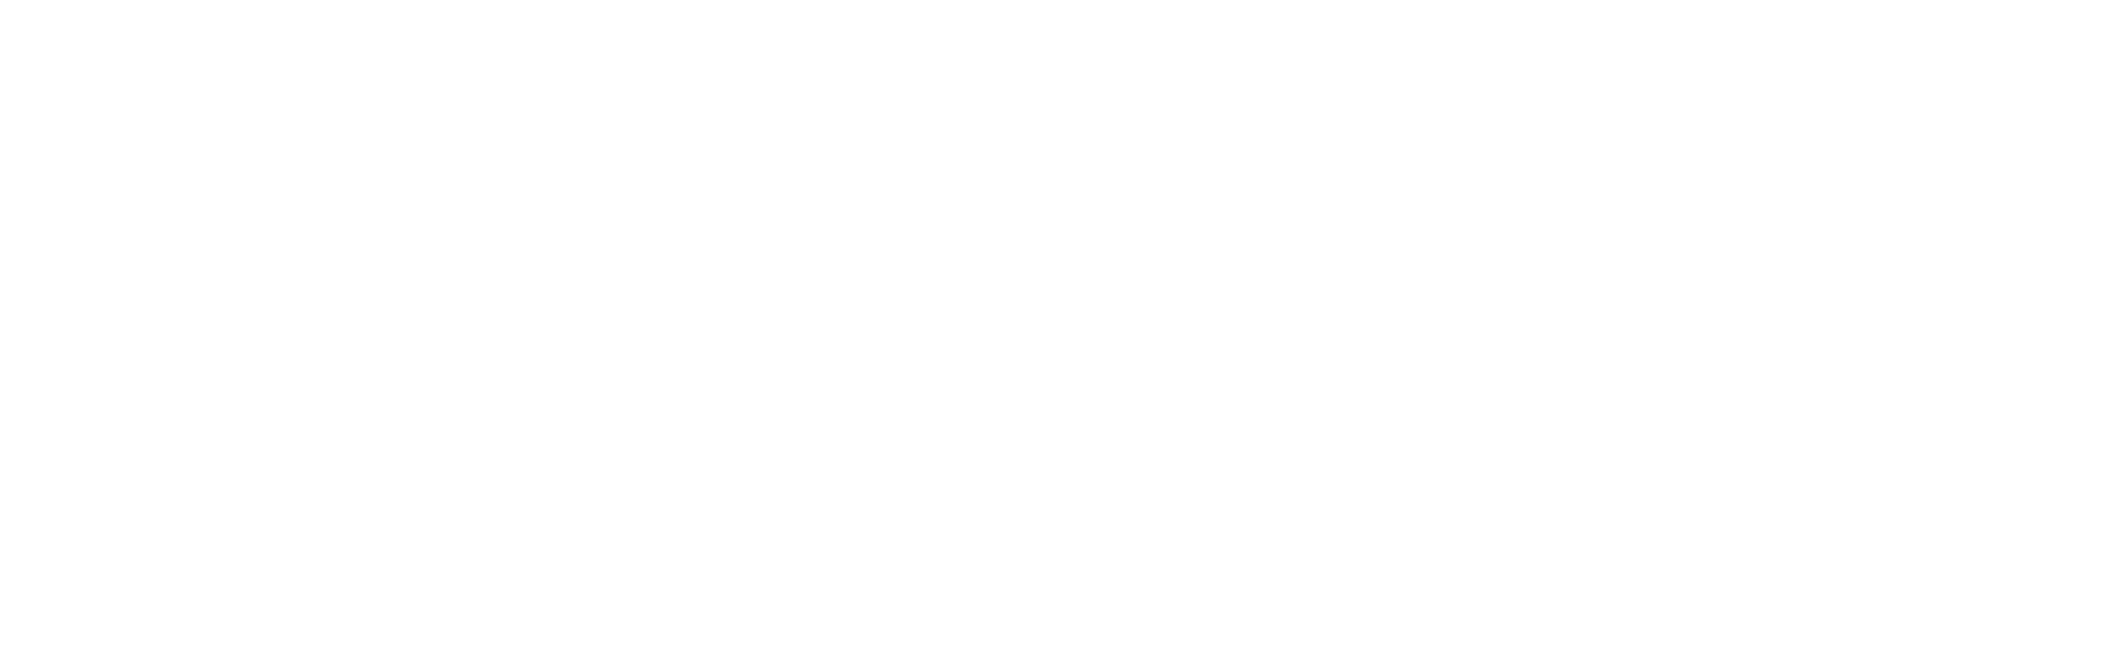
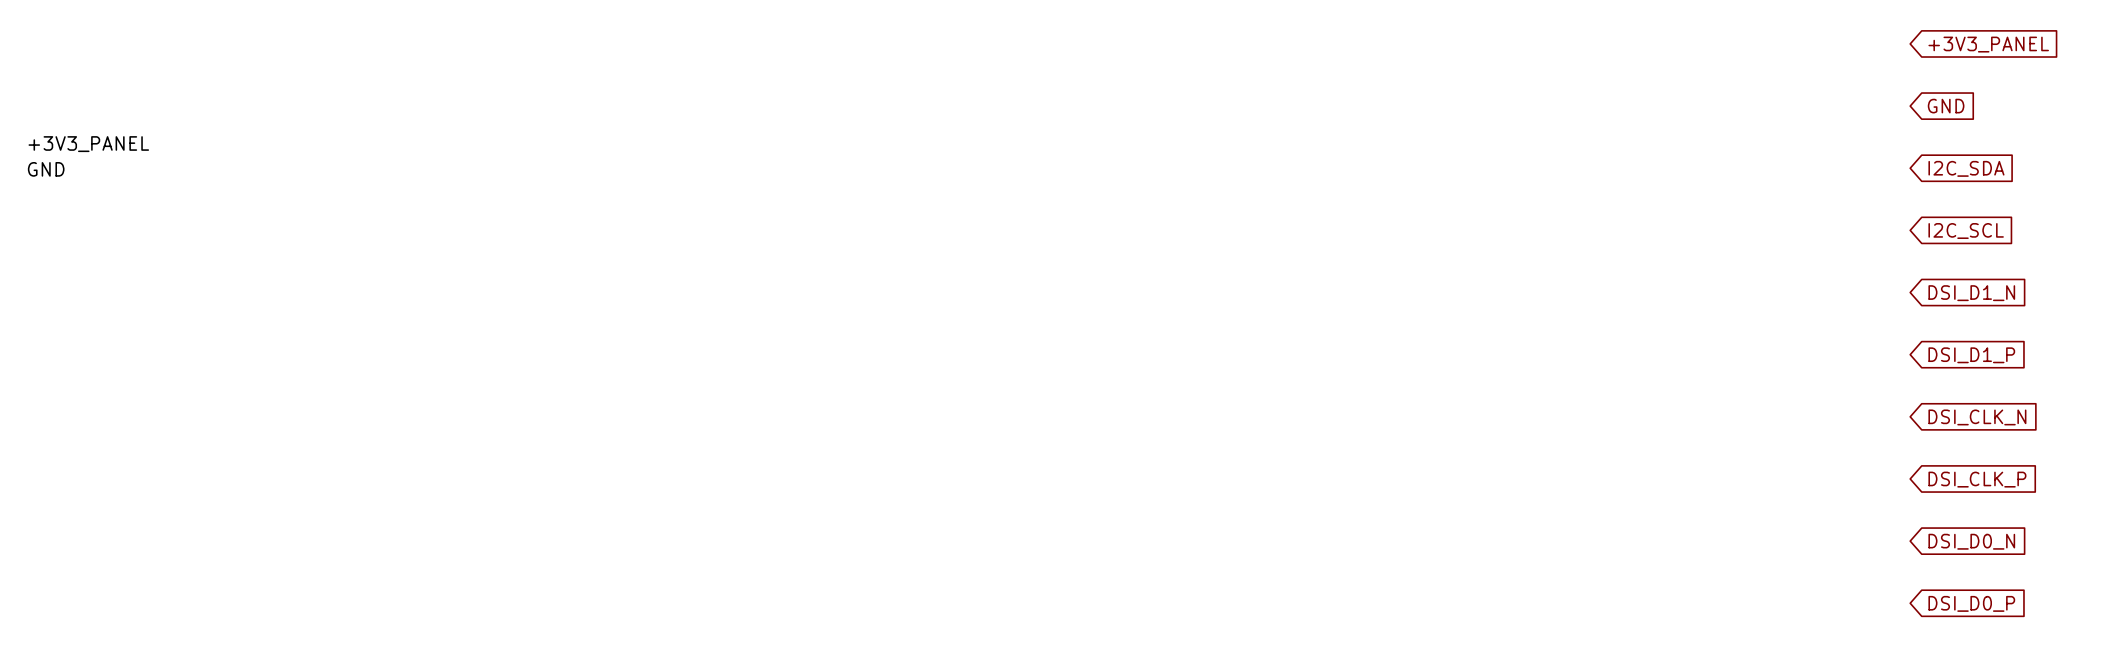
global label: none -> +3V3_PANEL (1988, 44)
global label: none -> GND (1946, 106)
label: none -> +3V3_PANEL (88, 144)
label: none -> GND (46, 169)
global label: none -> I2C_SDA (1966, 168)
global label: none -> I2C_SCL (1966, 231)
global label: none -> DSI_D1_N (1971, 293)
global label: none -> DSI_D1_P (1971, 355)
global label: none -> DSI_CLK_N (1977, 417)
global label: none -> DSI_CLK_P (1977, 479)
global label: none -> DSI_D0_N (1971, 541)
global label: none -> DSI_D0_P (1971, 603)

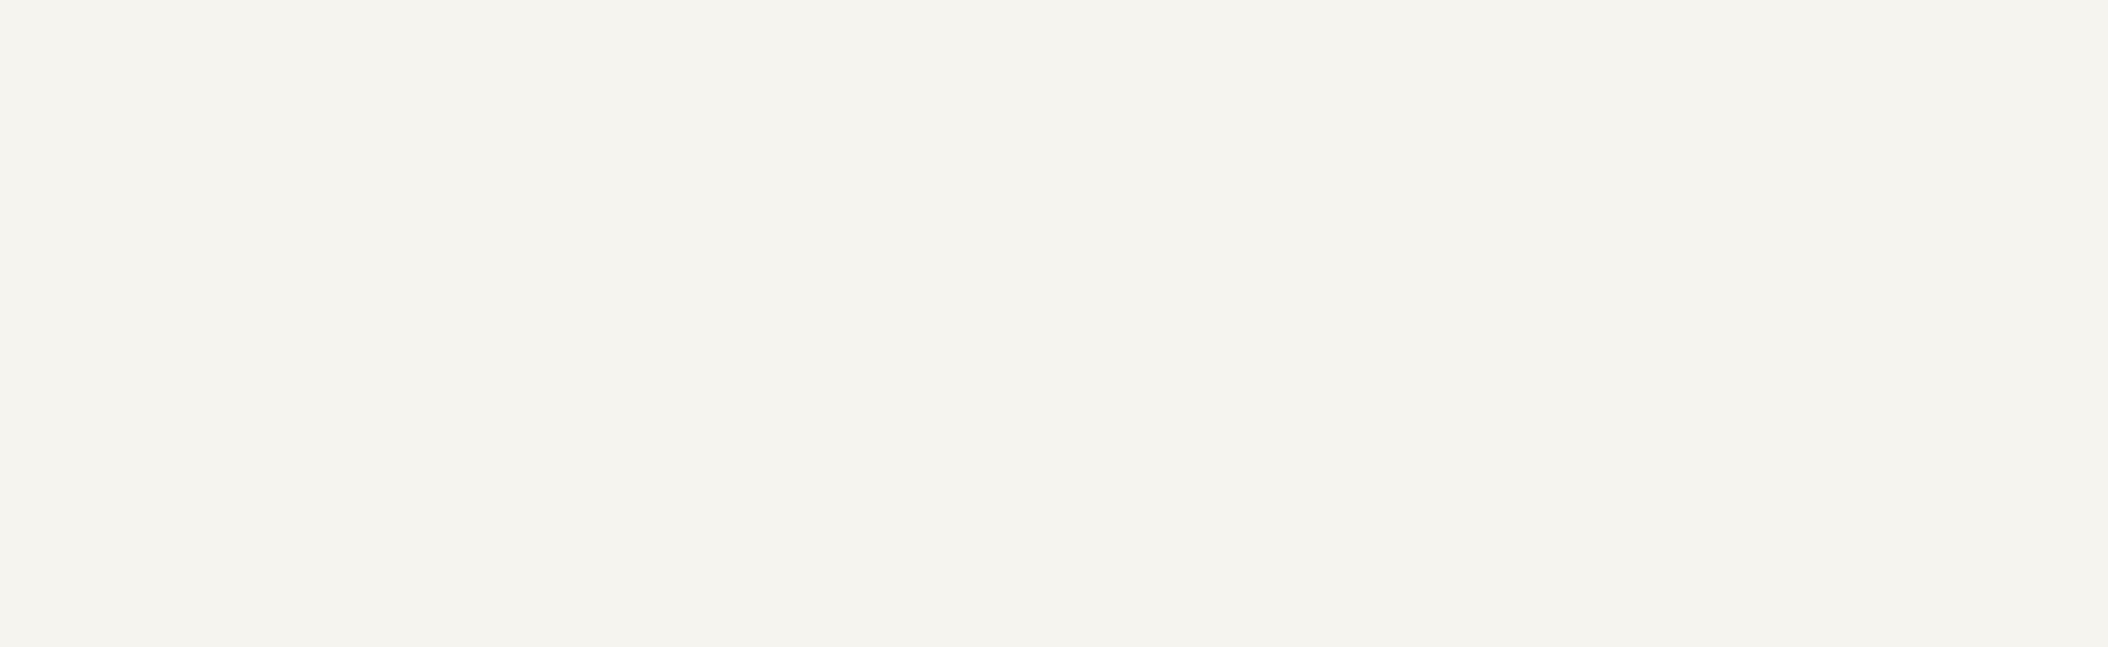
global label: +3V3_PANEL (1988, 44) -> none
global label: GND (1946, 106) -> none
label: +3V3_PANEL (88, 144) -> none
global label: I2C_SDA (1966, 168) -> none
label: GND (46, 169) -> none
global label: I2C_SCL (1966, 231) -> none
global label: DSI_D1_N (1971, 293) -> none
global label: DSI_D1_P (1971, 355) -> none
global label: DSI_CLK_N (1977, 417) -> none
global label: DSI_CLK_P (1977, 479) -> none
global label: DSI_D0_N (1971, 541) -> none
global label: DSI_D0_P (1971, 603) -> none

